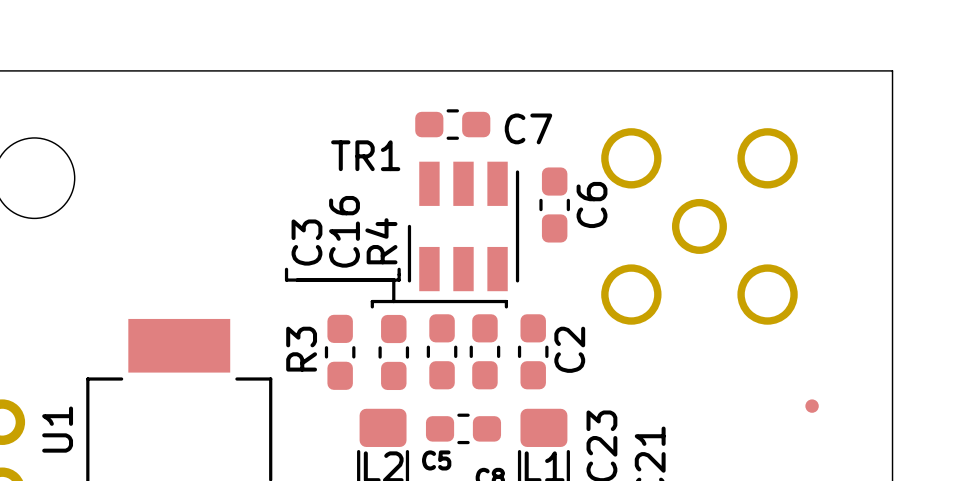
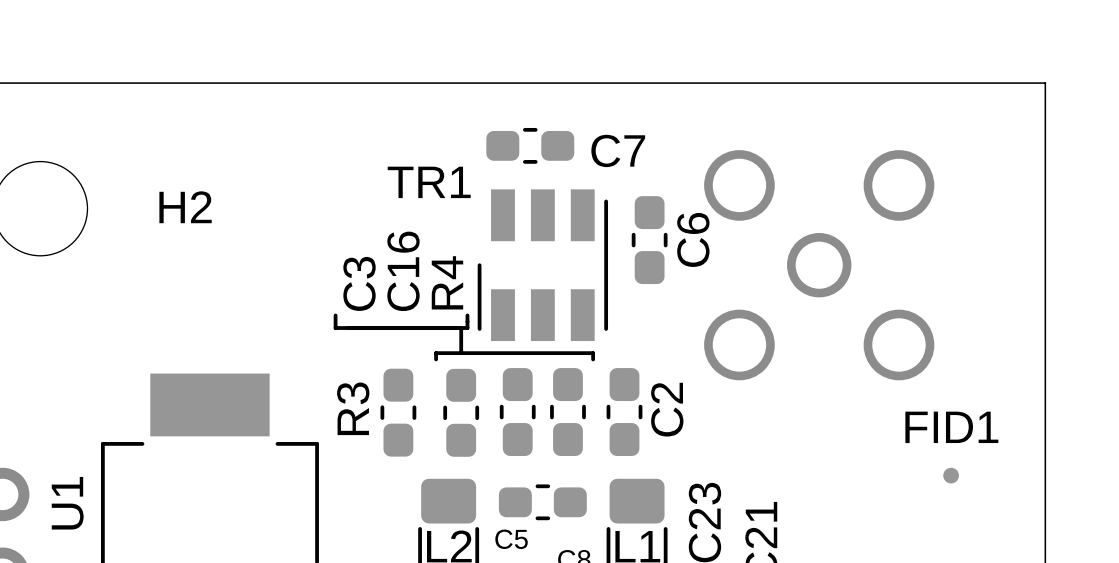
H2 name: none -> H2 (185, 207)
FID1 name: none -> FID1 (951, 427)

